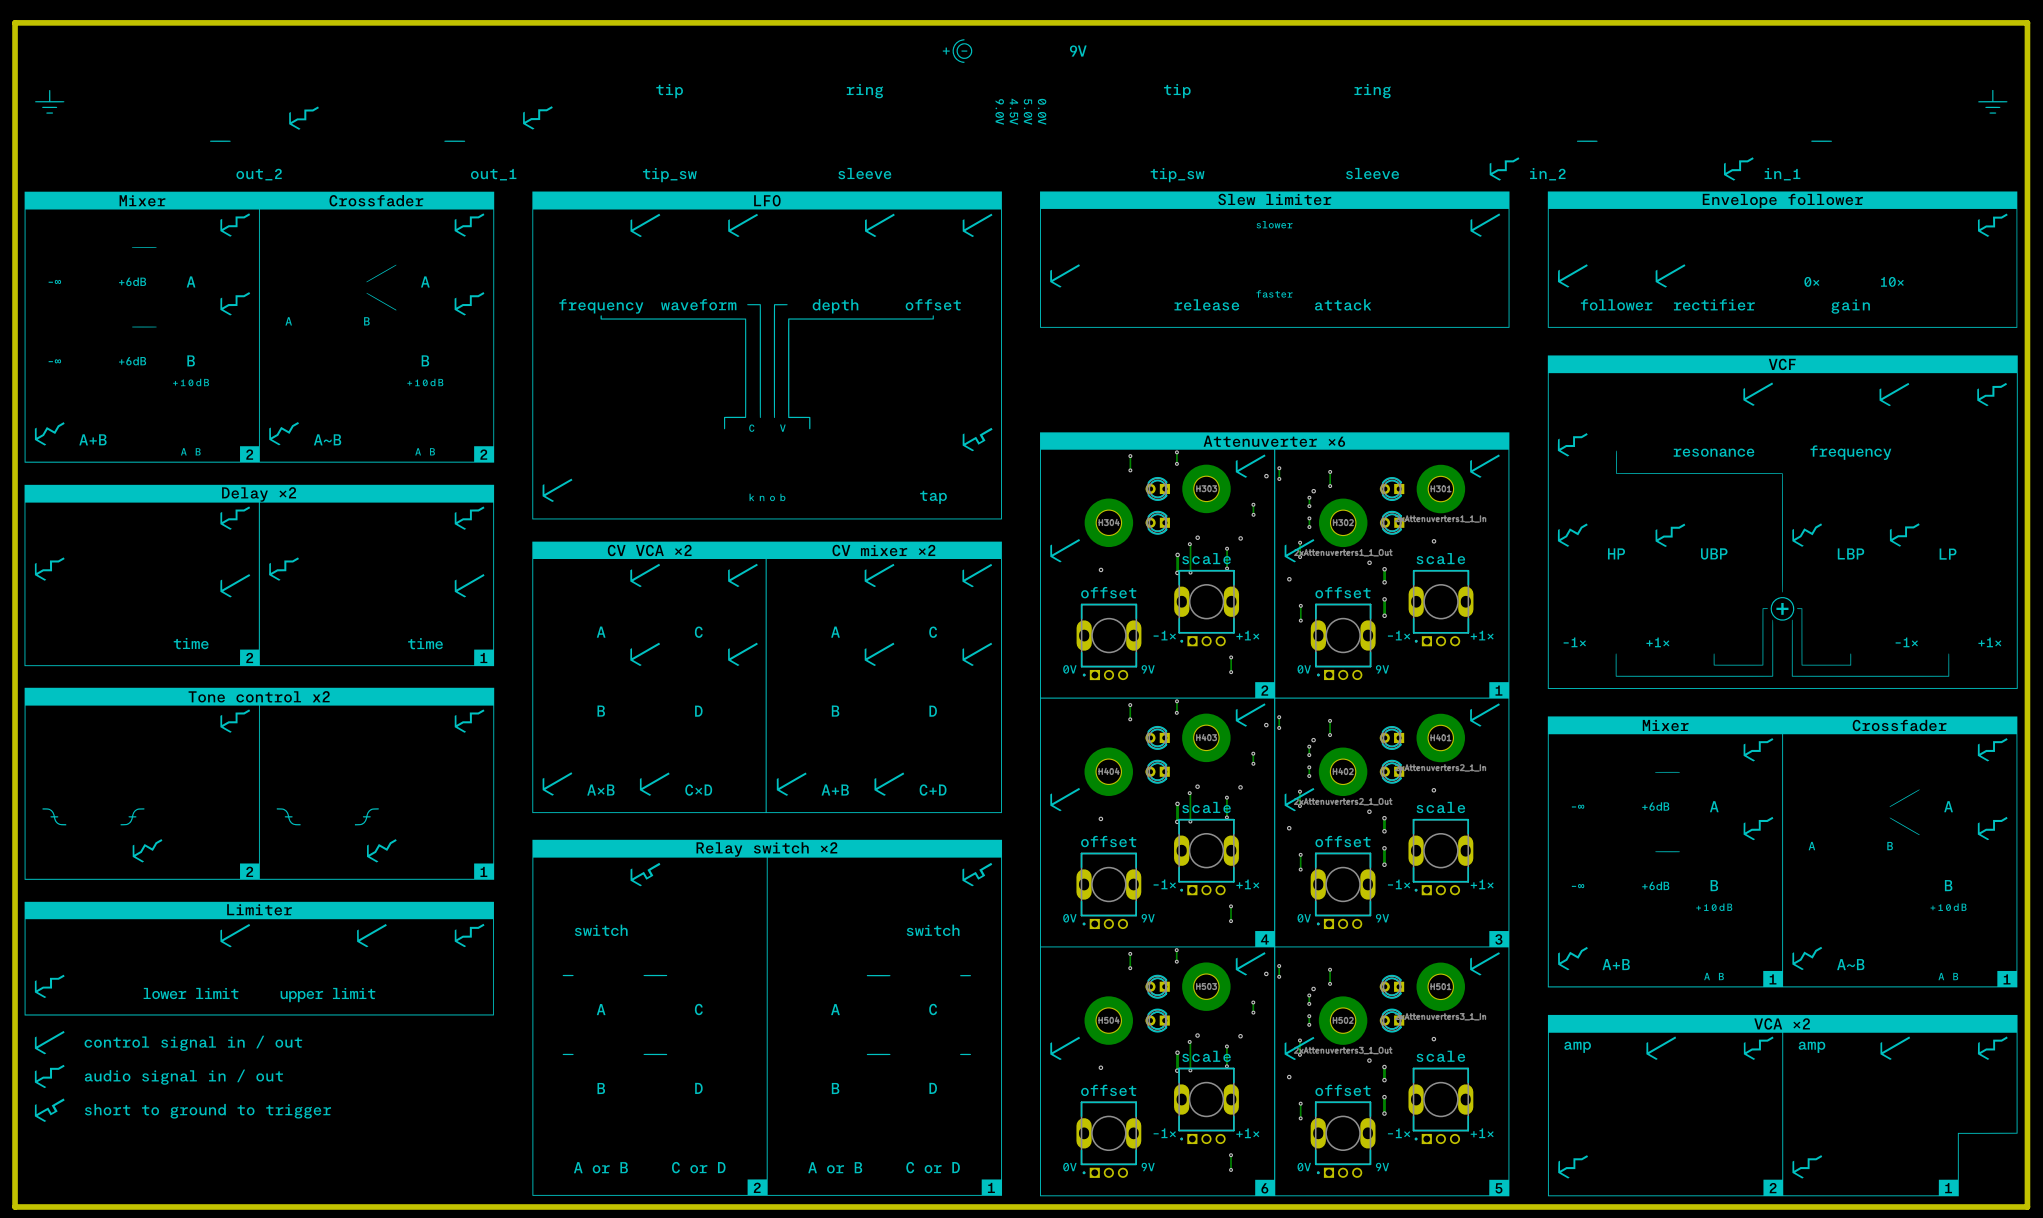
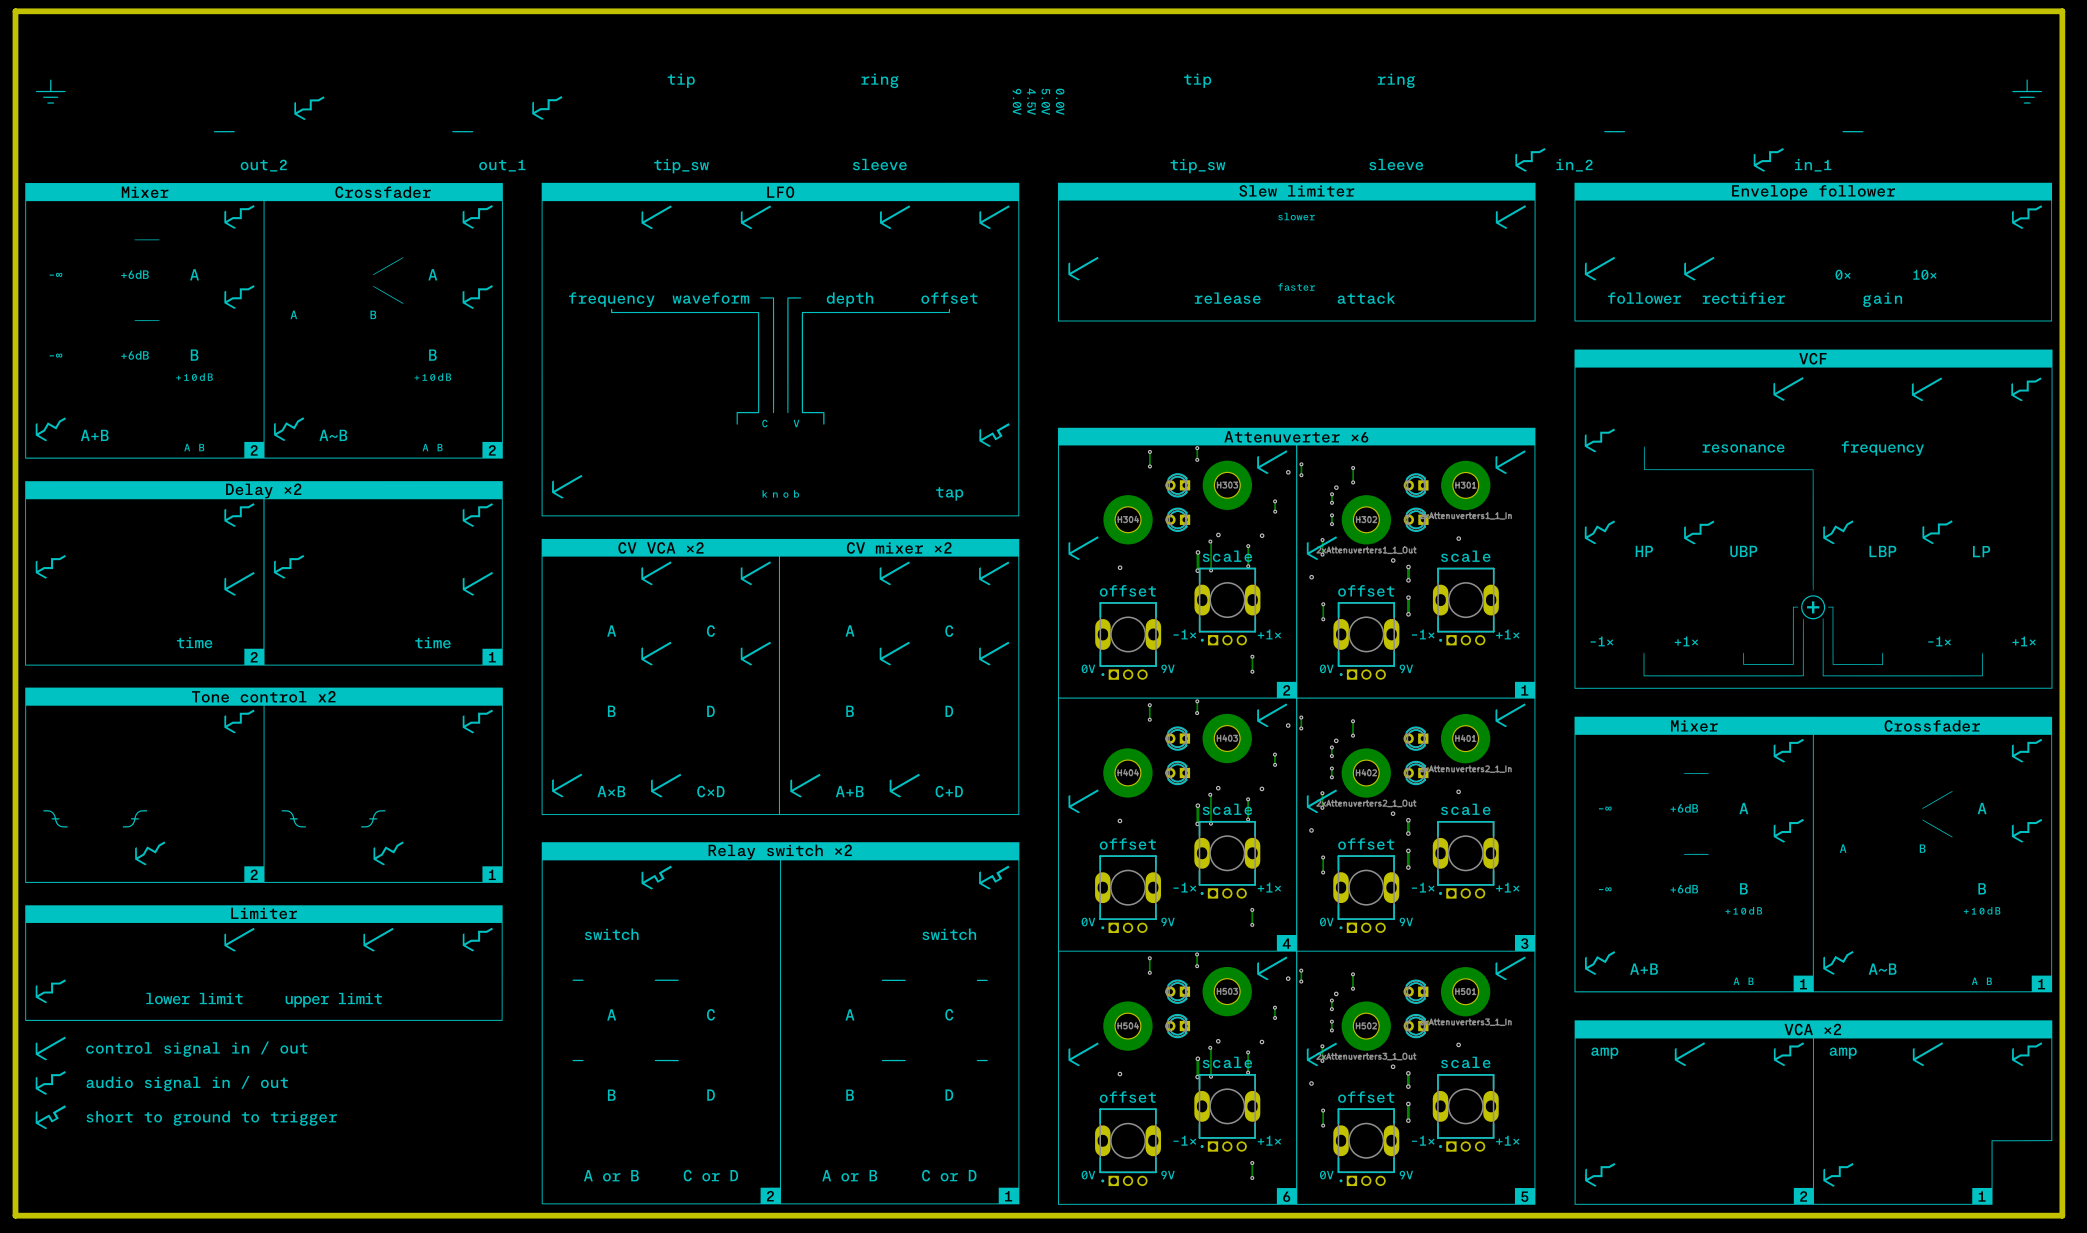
drawing: [24, 39, 2018, 1197] -> none

